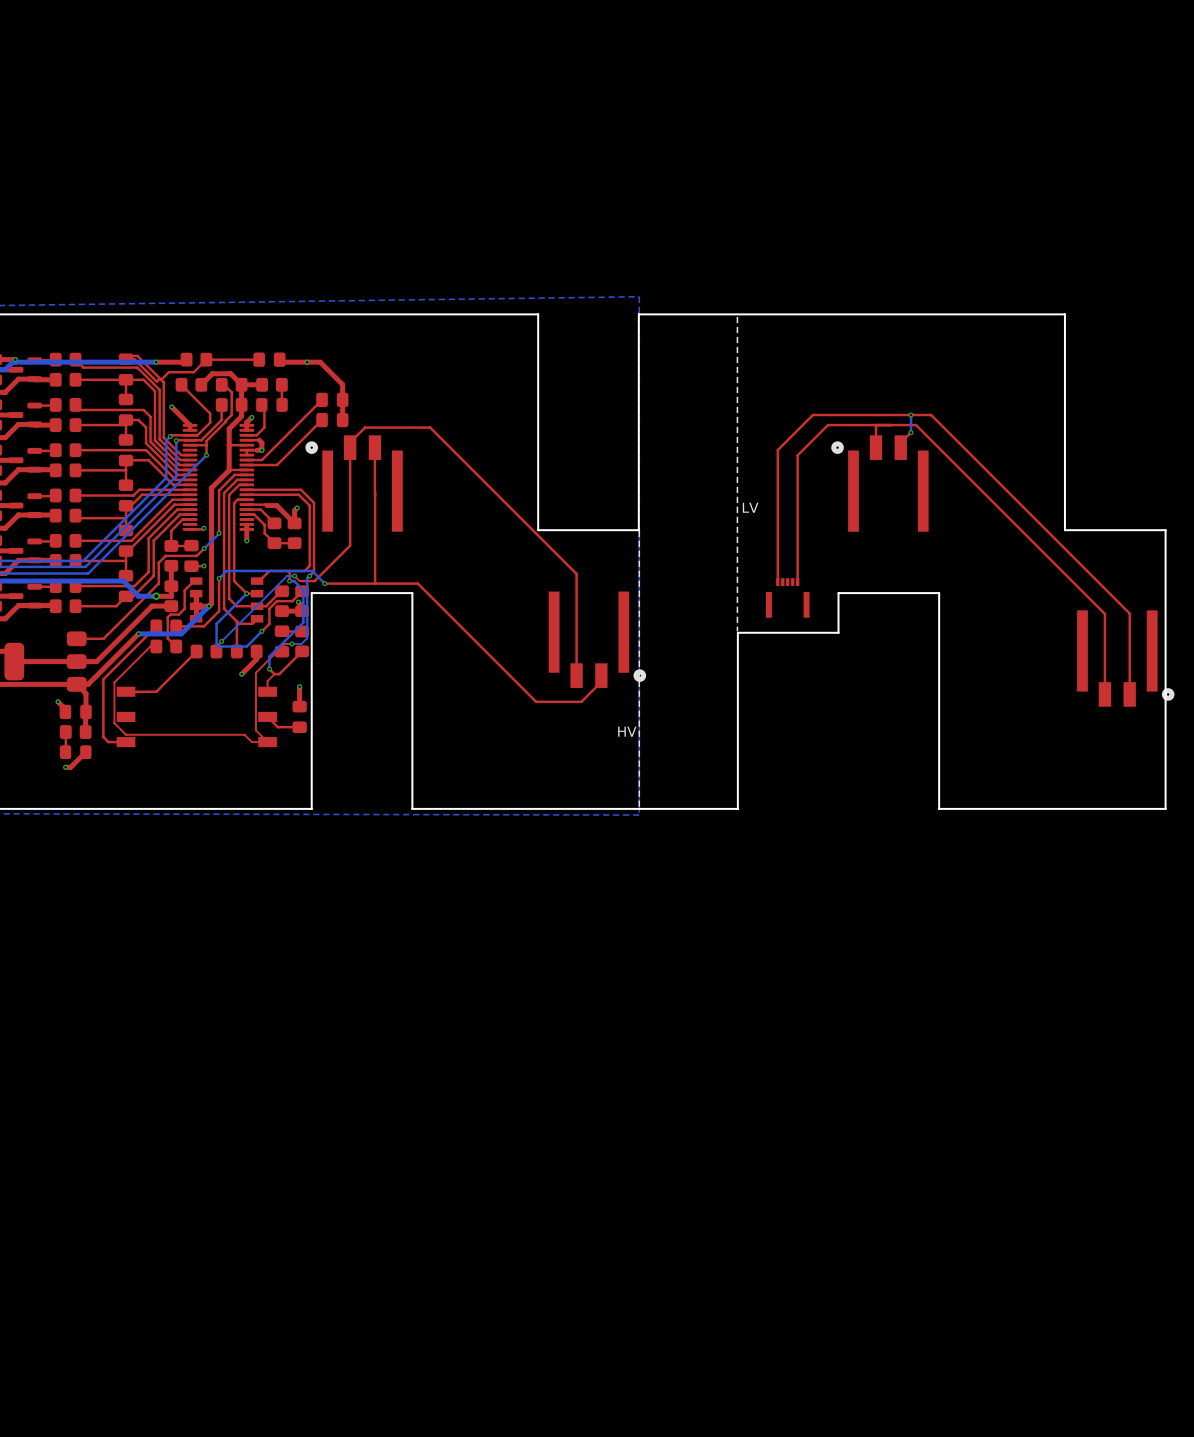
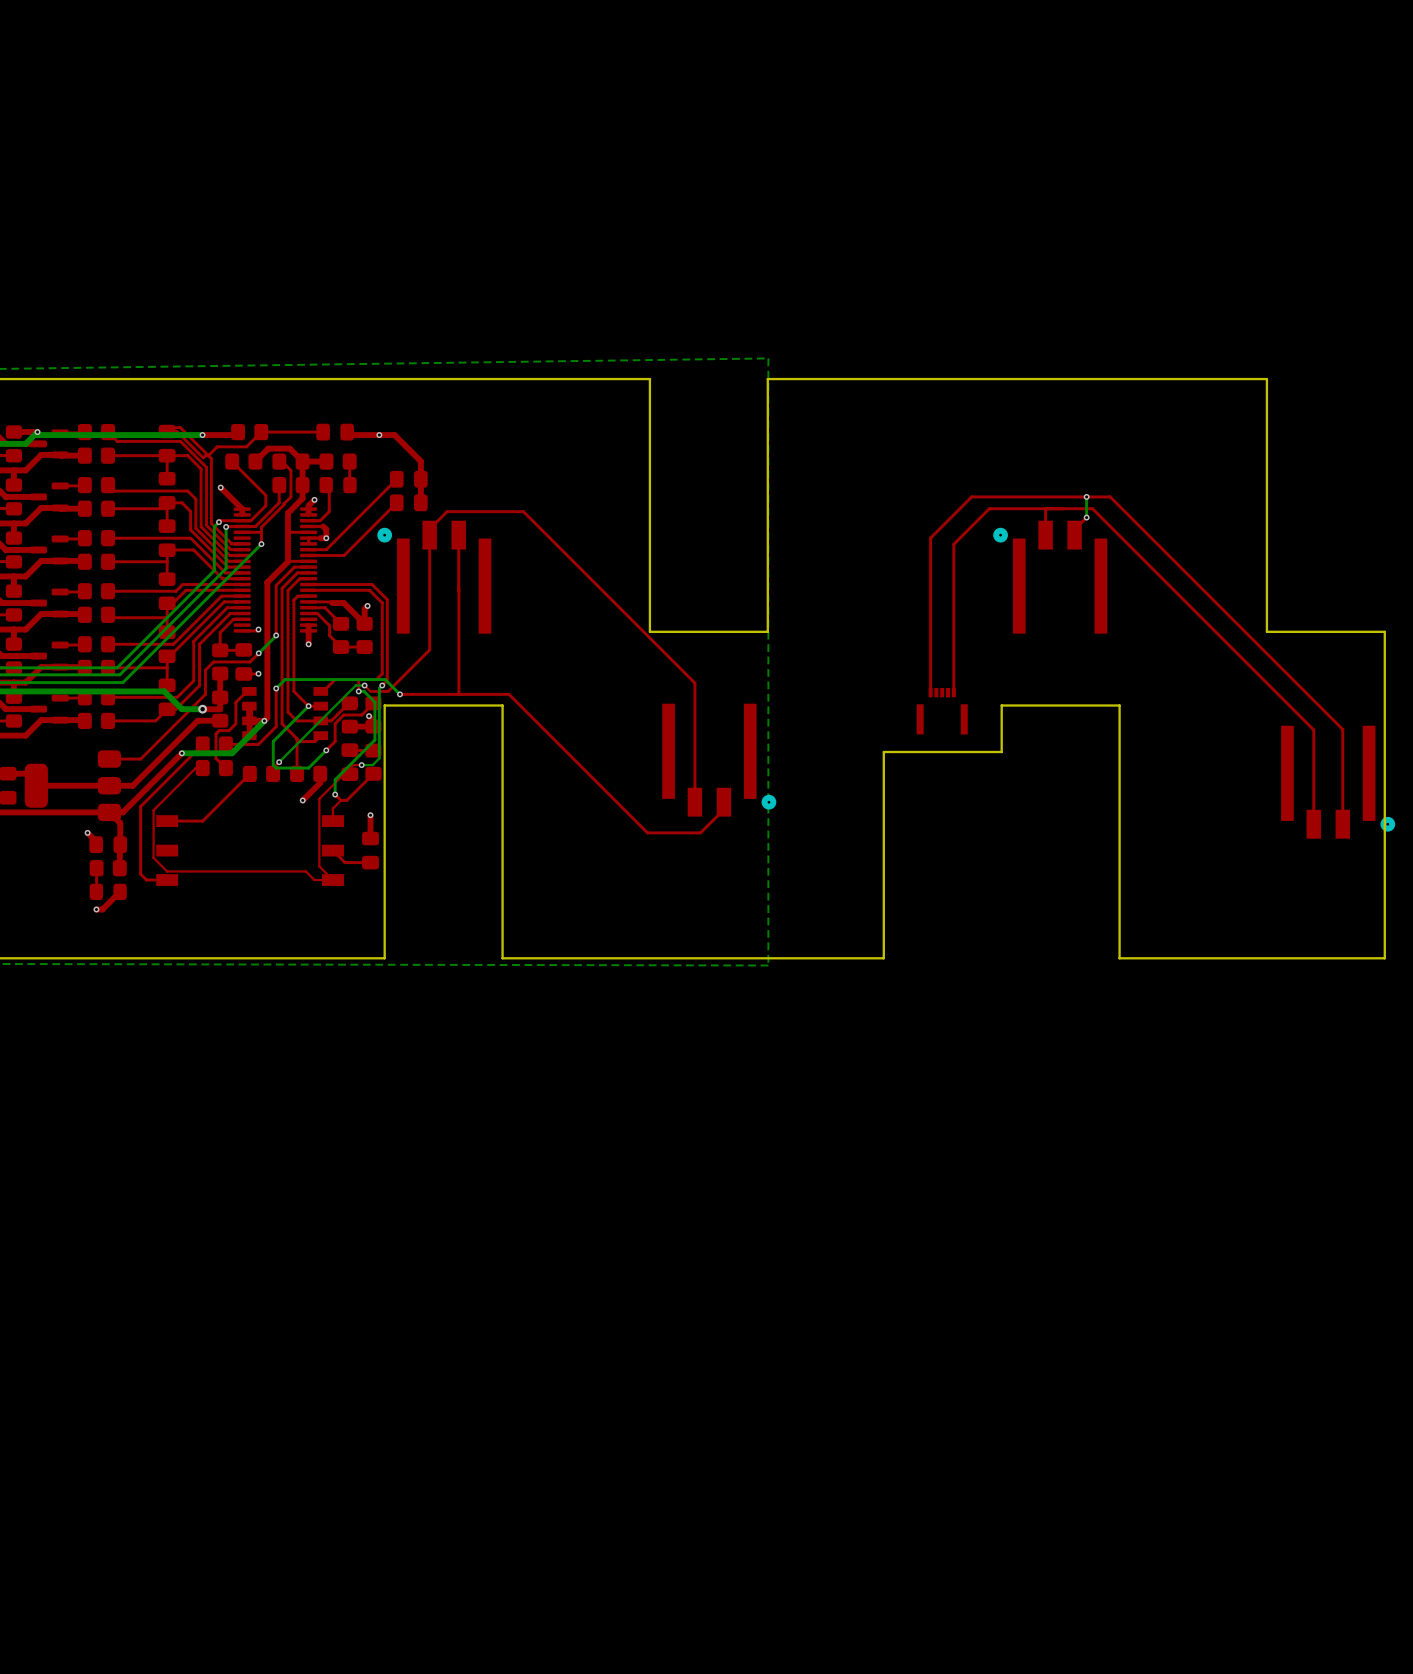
line: (737, 316) (737, 631) -> none
text: LV (750, 507) -> none
line: (639, 530) (639, 807) -> none
text: HV (627, 731) -> none

